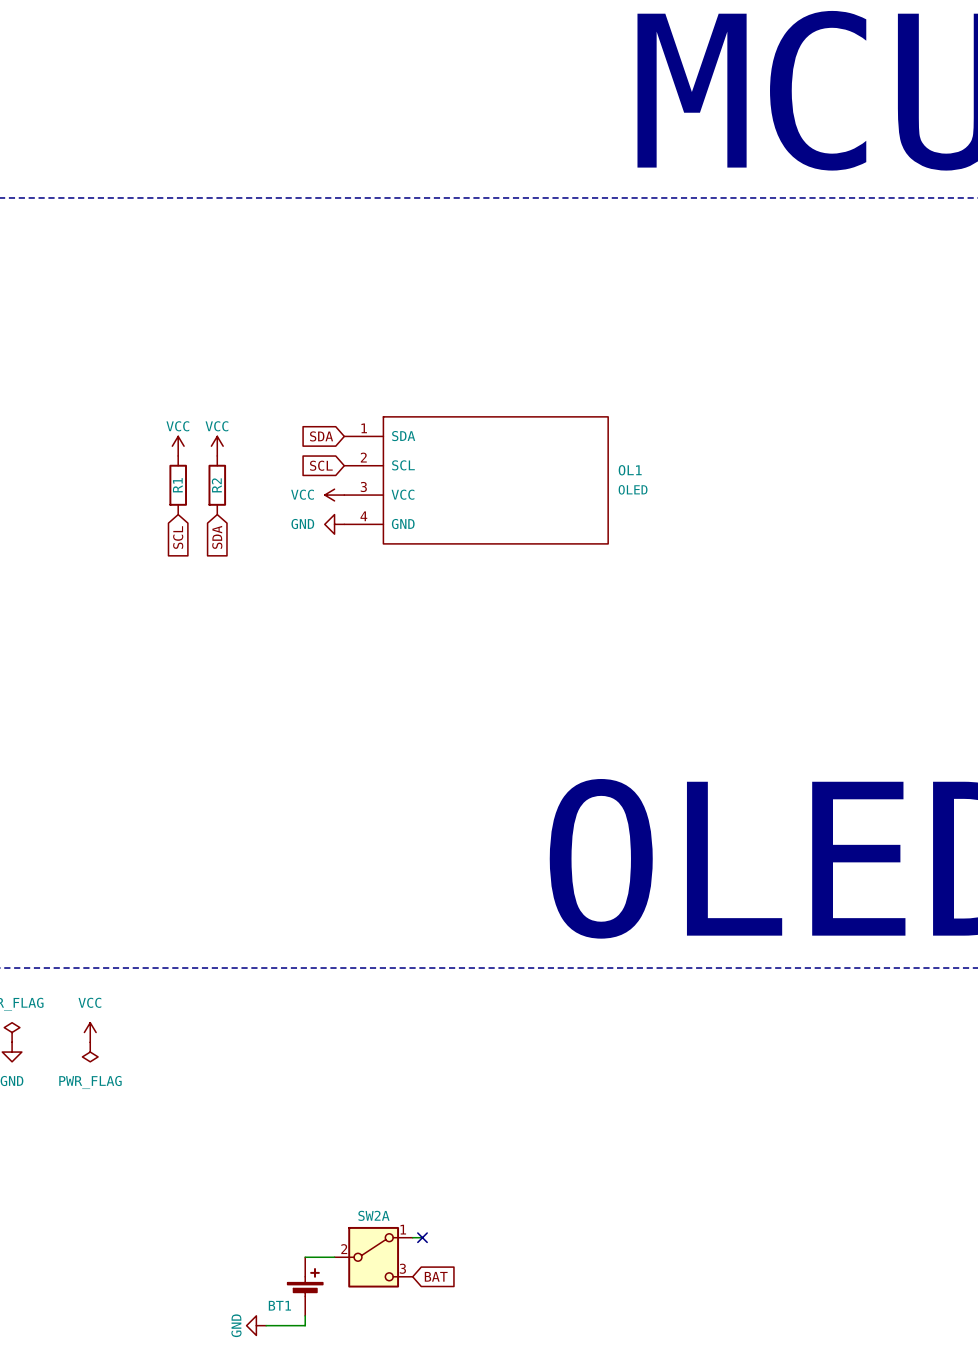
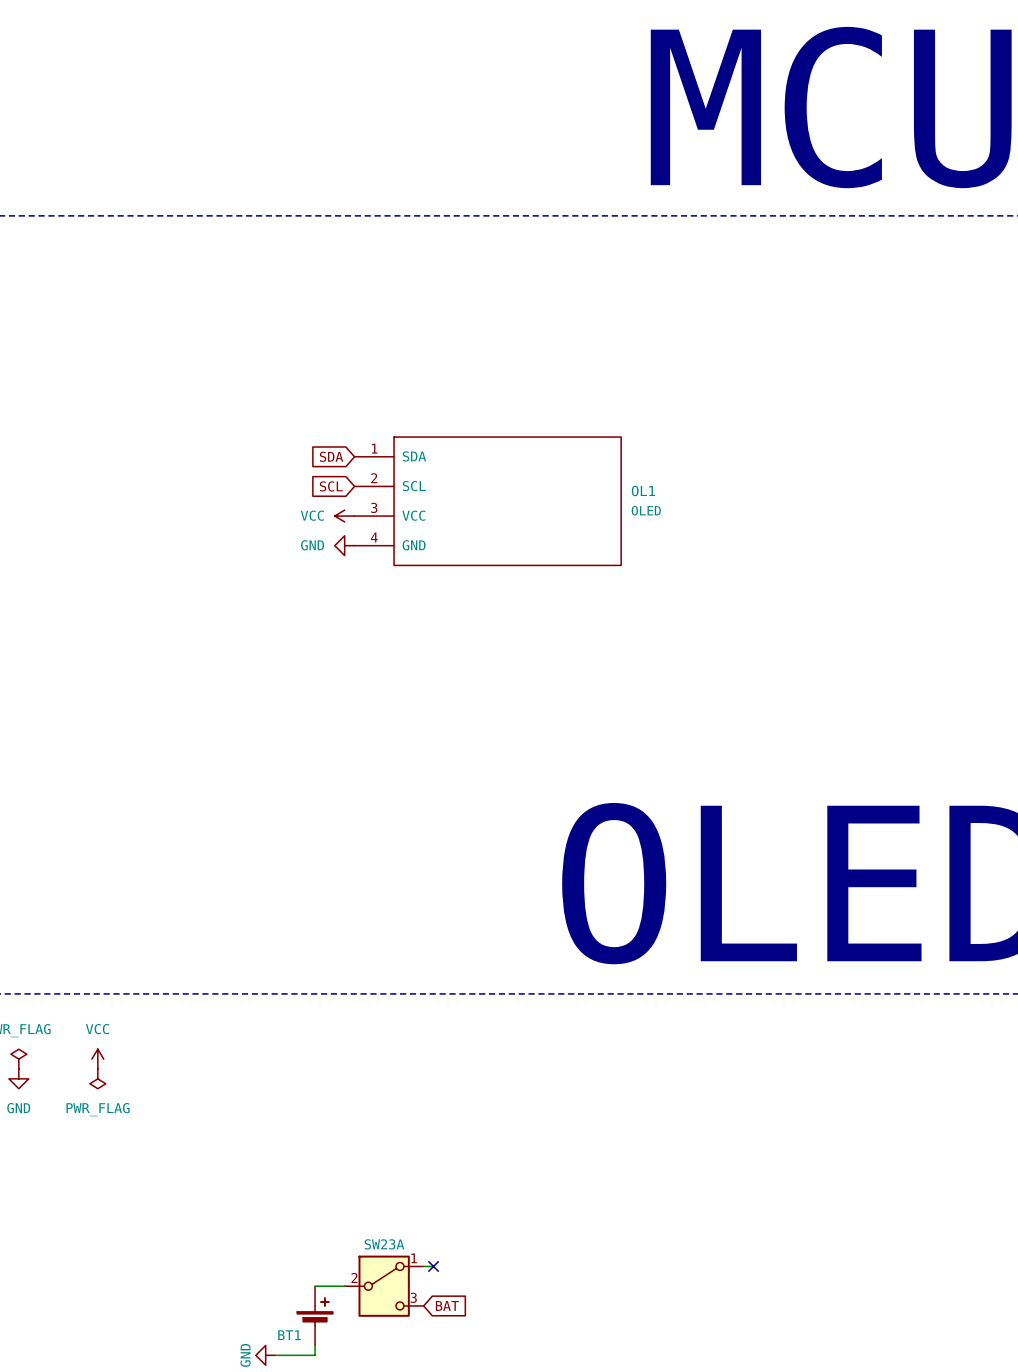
power symbol: VCC (178, 446) -> none
power symbol: VCC (217, 446) -> none
R1: (178, 485) -> none
R2: (217, 485) -> none
global label: SCL (178, 537) -> none
global label: SDA (217, 537) -> none
SW2A name: SW2A (373, 1215) -> SW23A (384, 1244)

